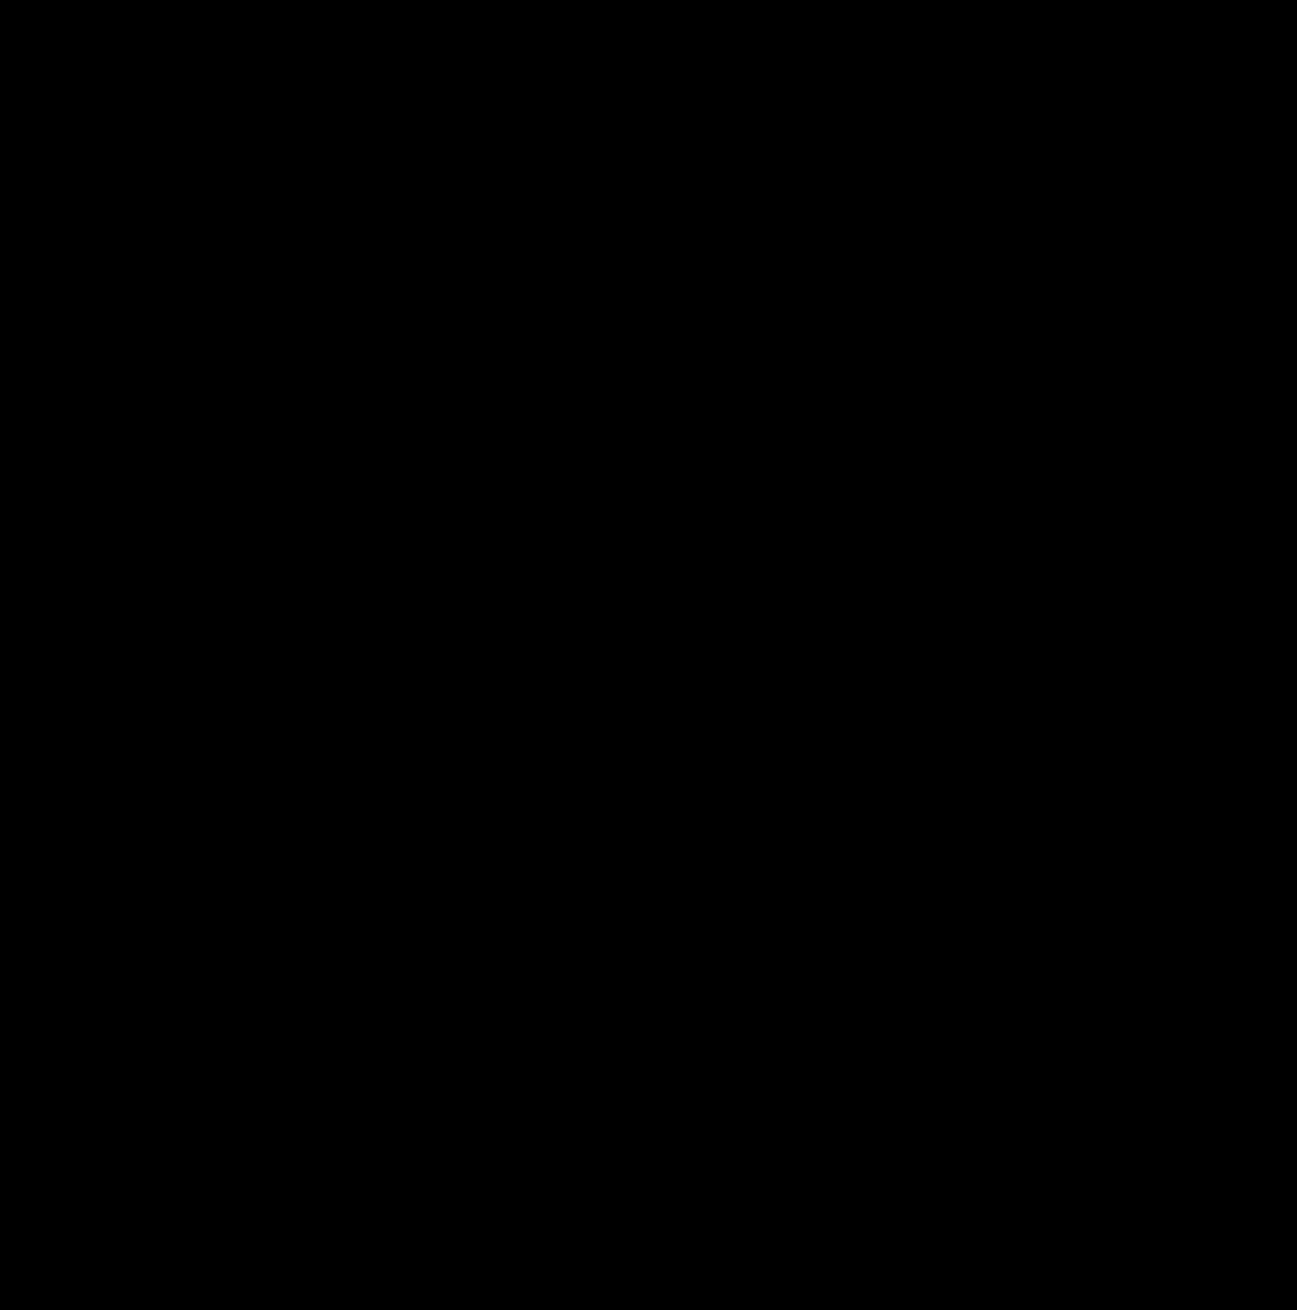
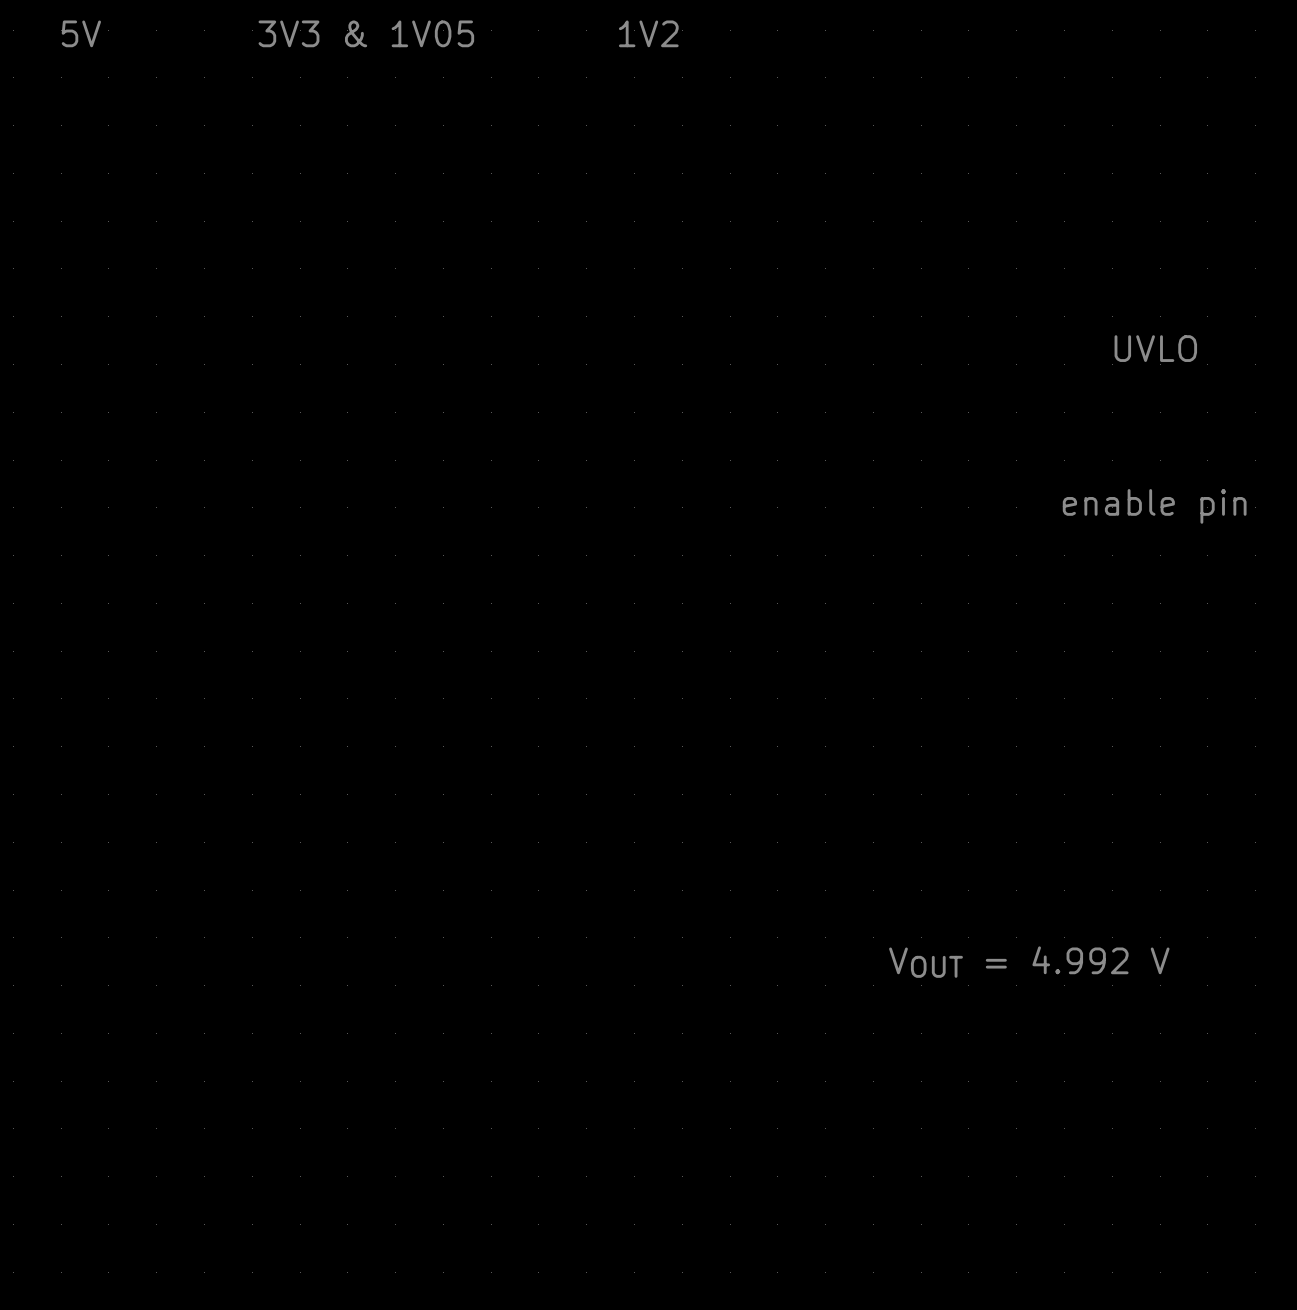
text: none -> 5V (81, 33)
text: none -> 3V3 & 1V05 (366, 33)
text: none -> 1V2 (648, 33)
text: none -> UVLO (1155, 348)
text: none -> enable pin (1154, 506)
text: none -> VOUT = 4.992 V (1029, 962)

